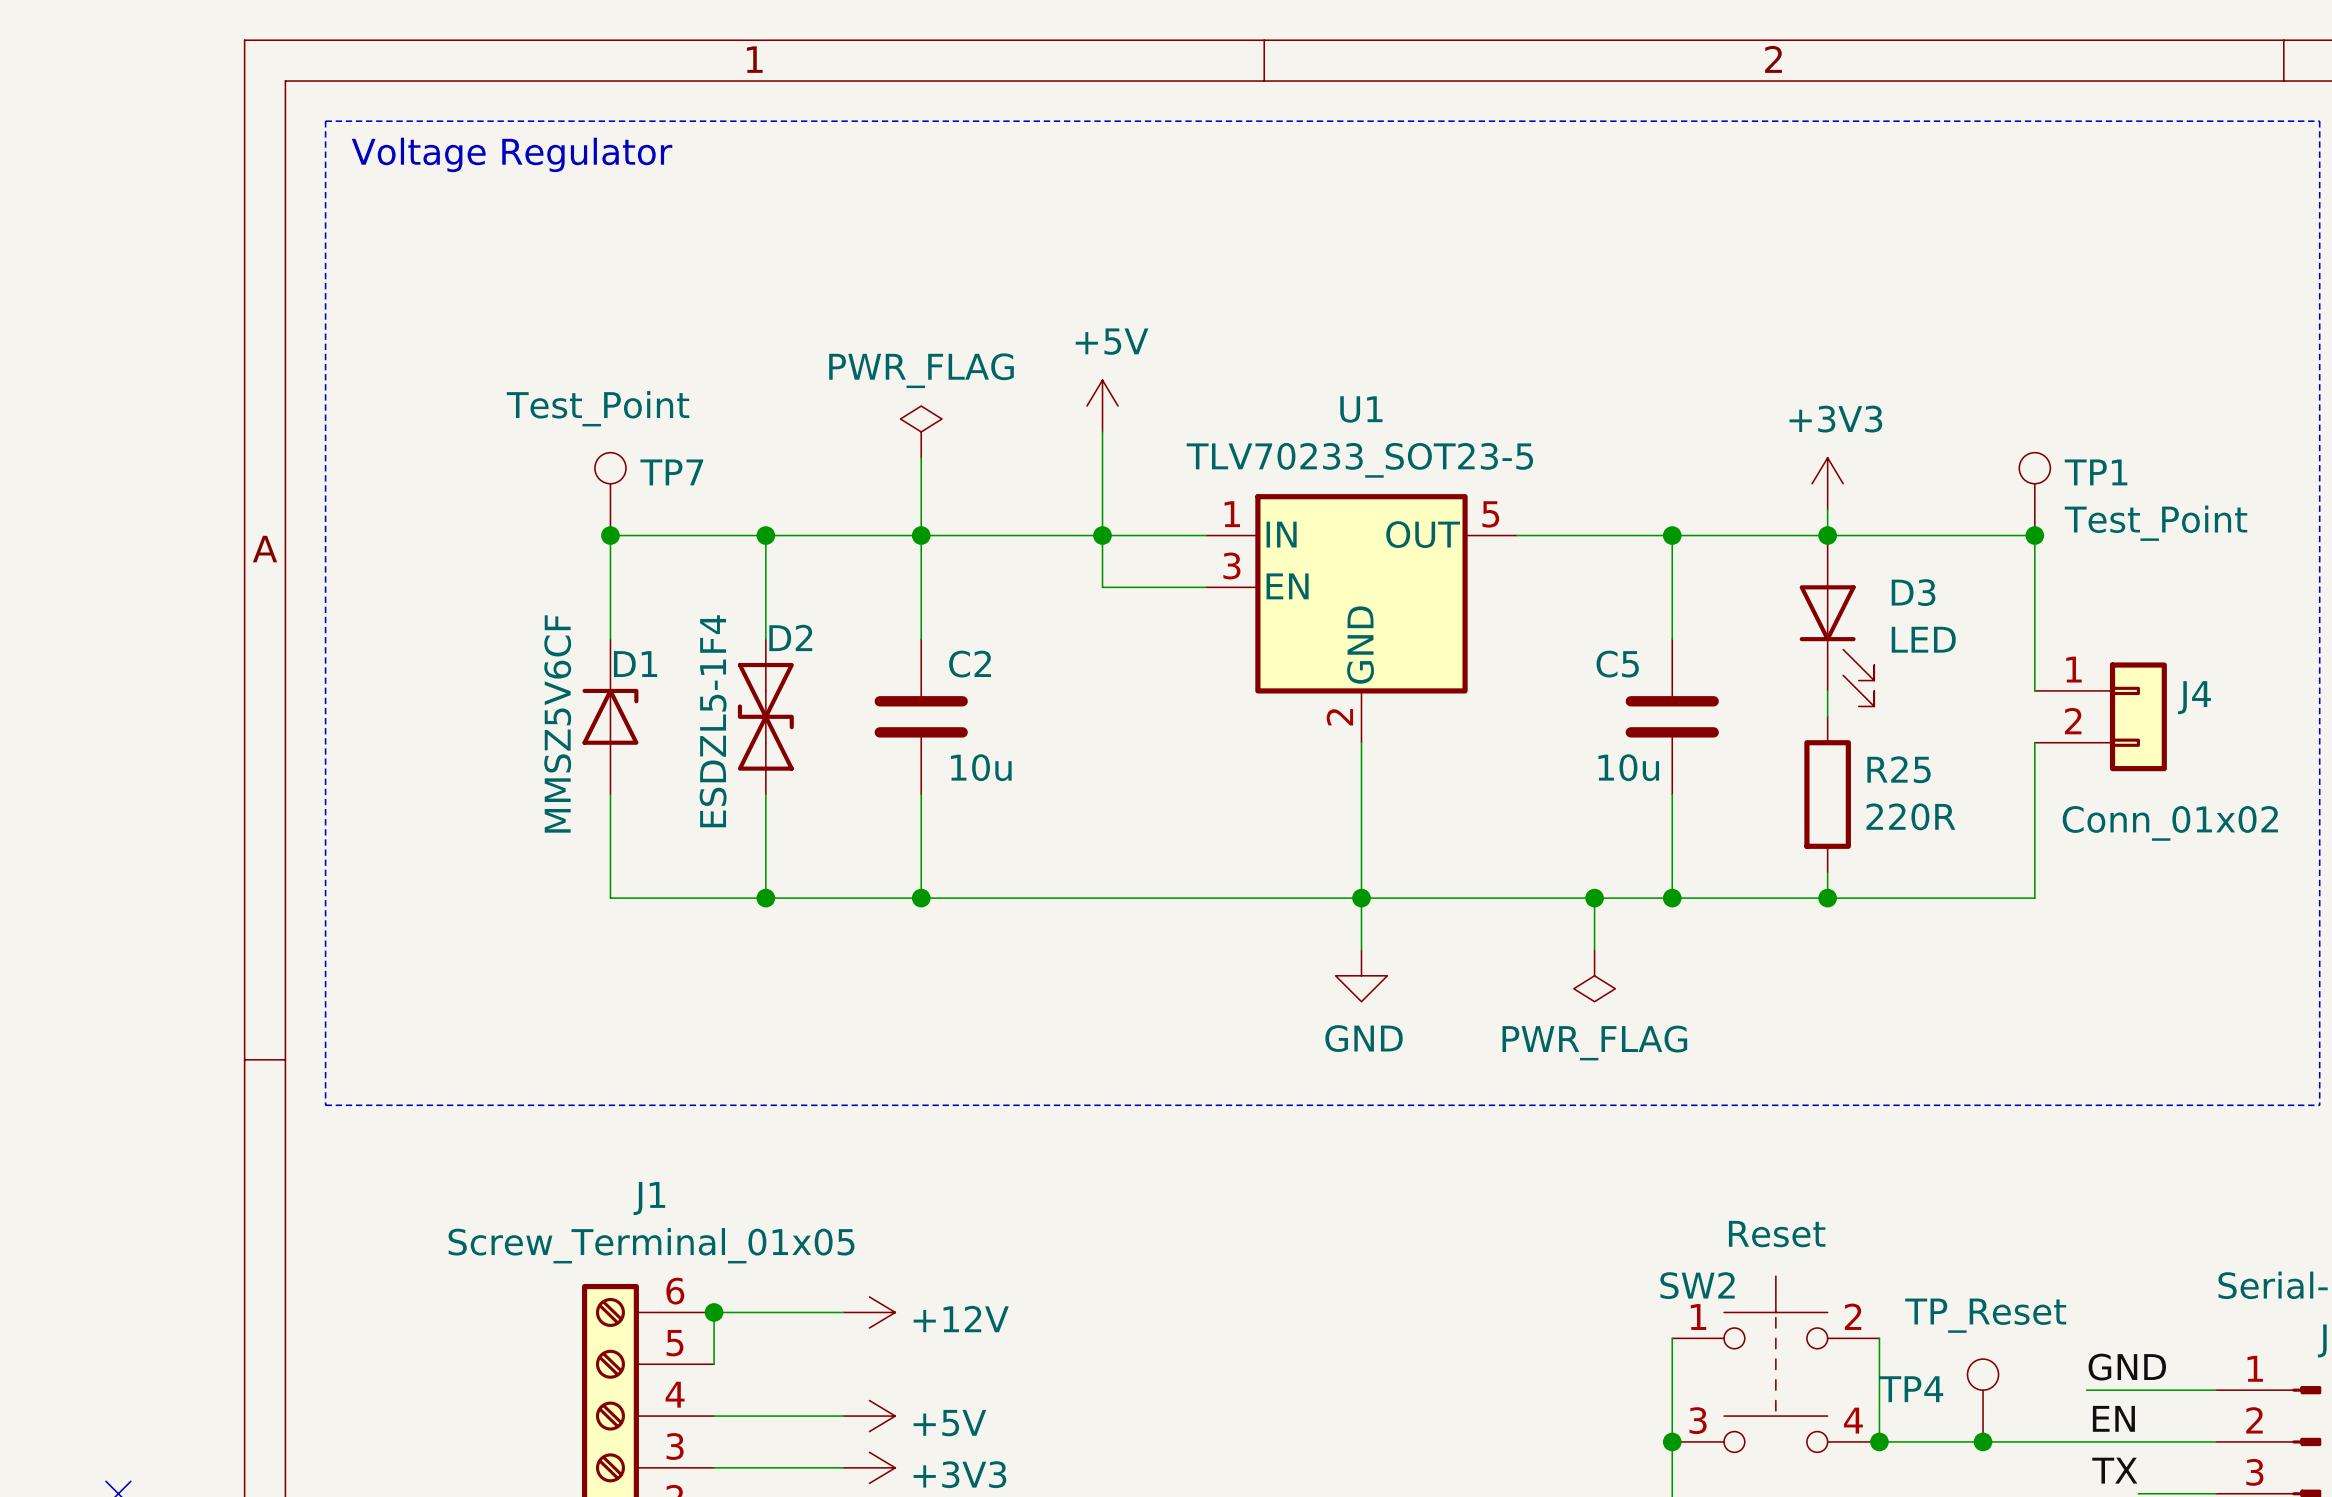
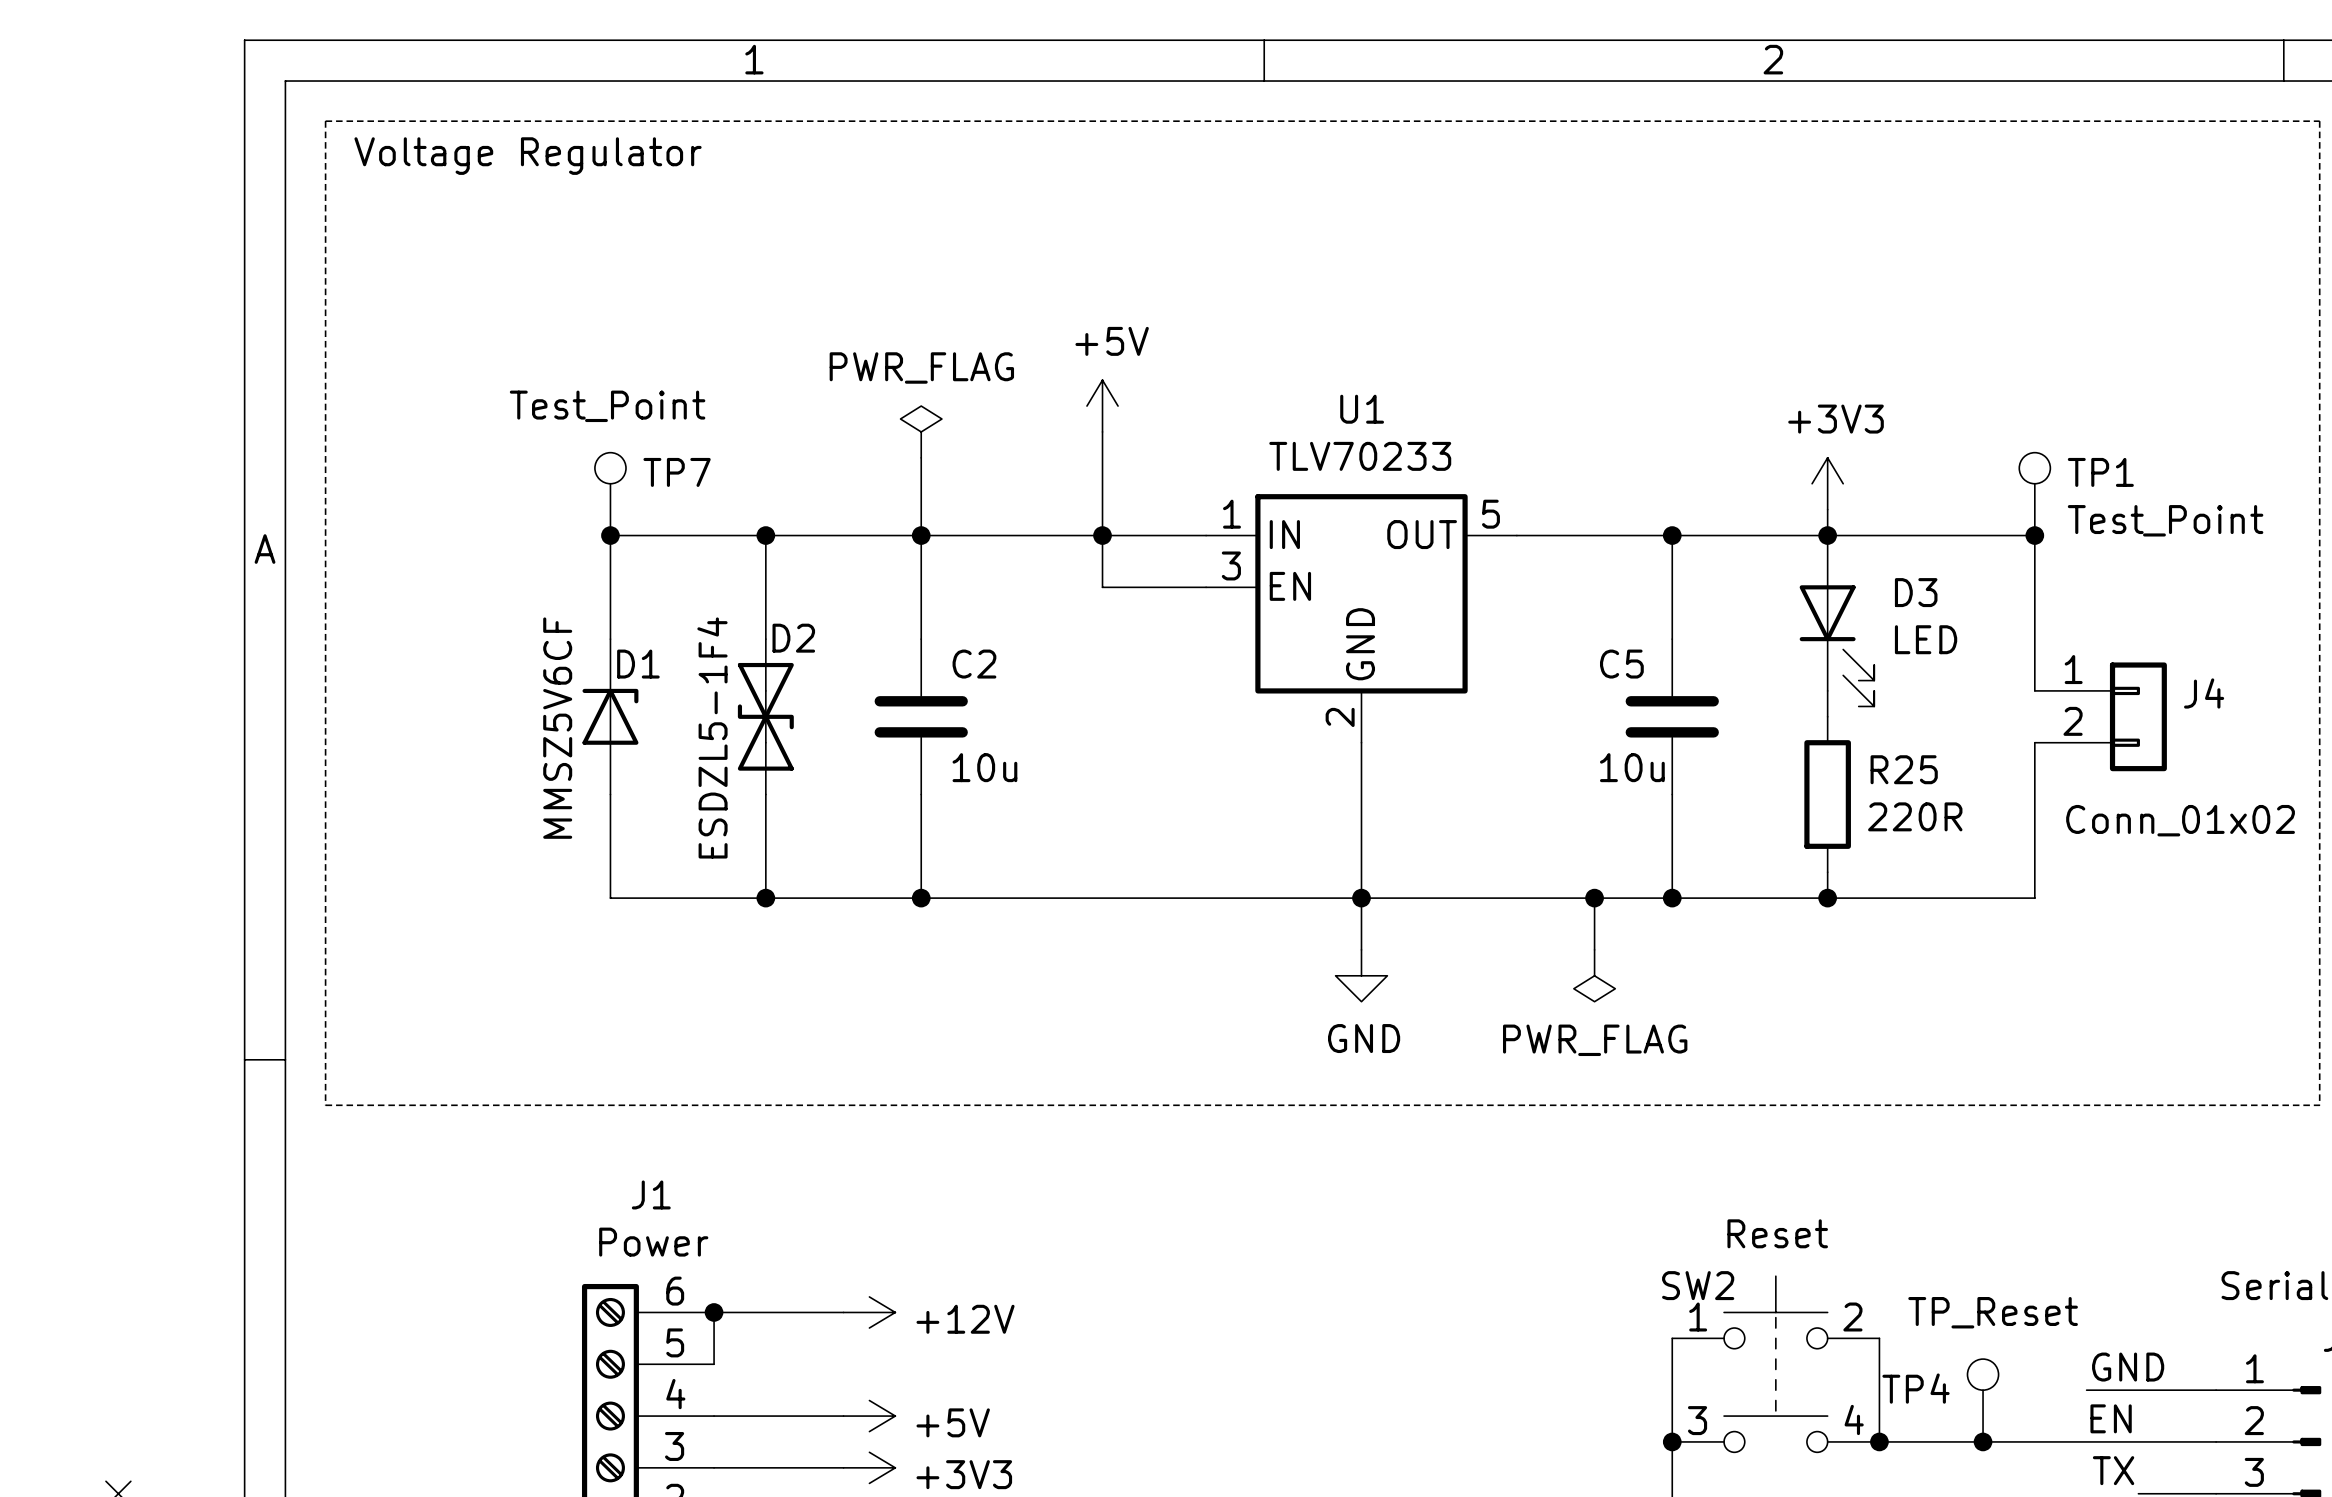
U1 value: TLV70233_SOT23-5 (1359, 460) -> TLV70233 (1360, 456)
J1 value: Screw_Terminal_01x05 (651, 1245) -> Power (653, 1242)

